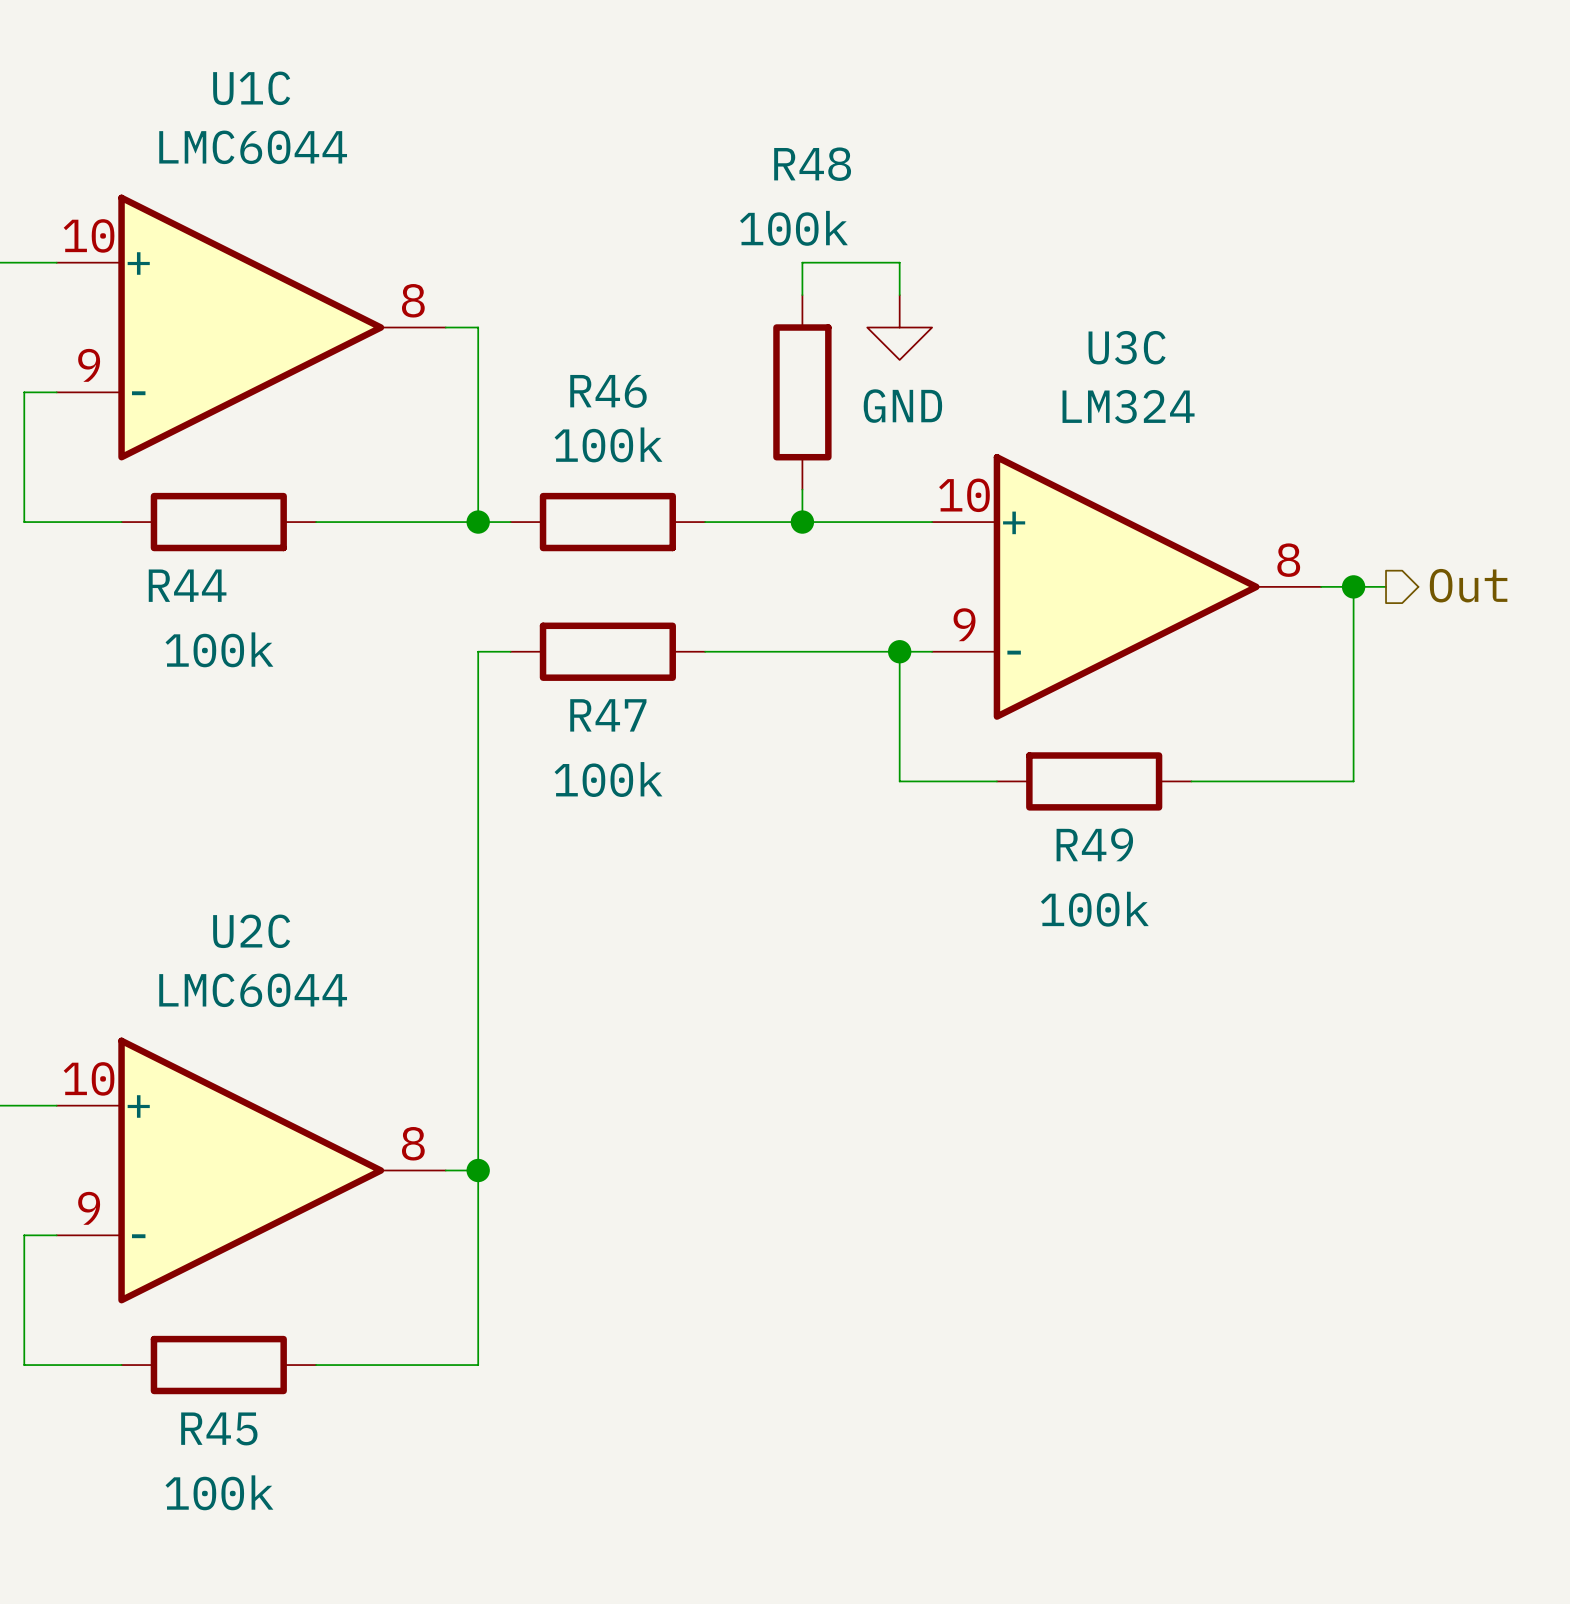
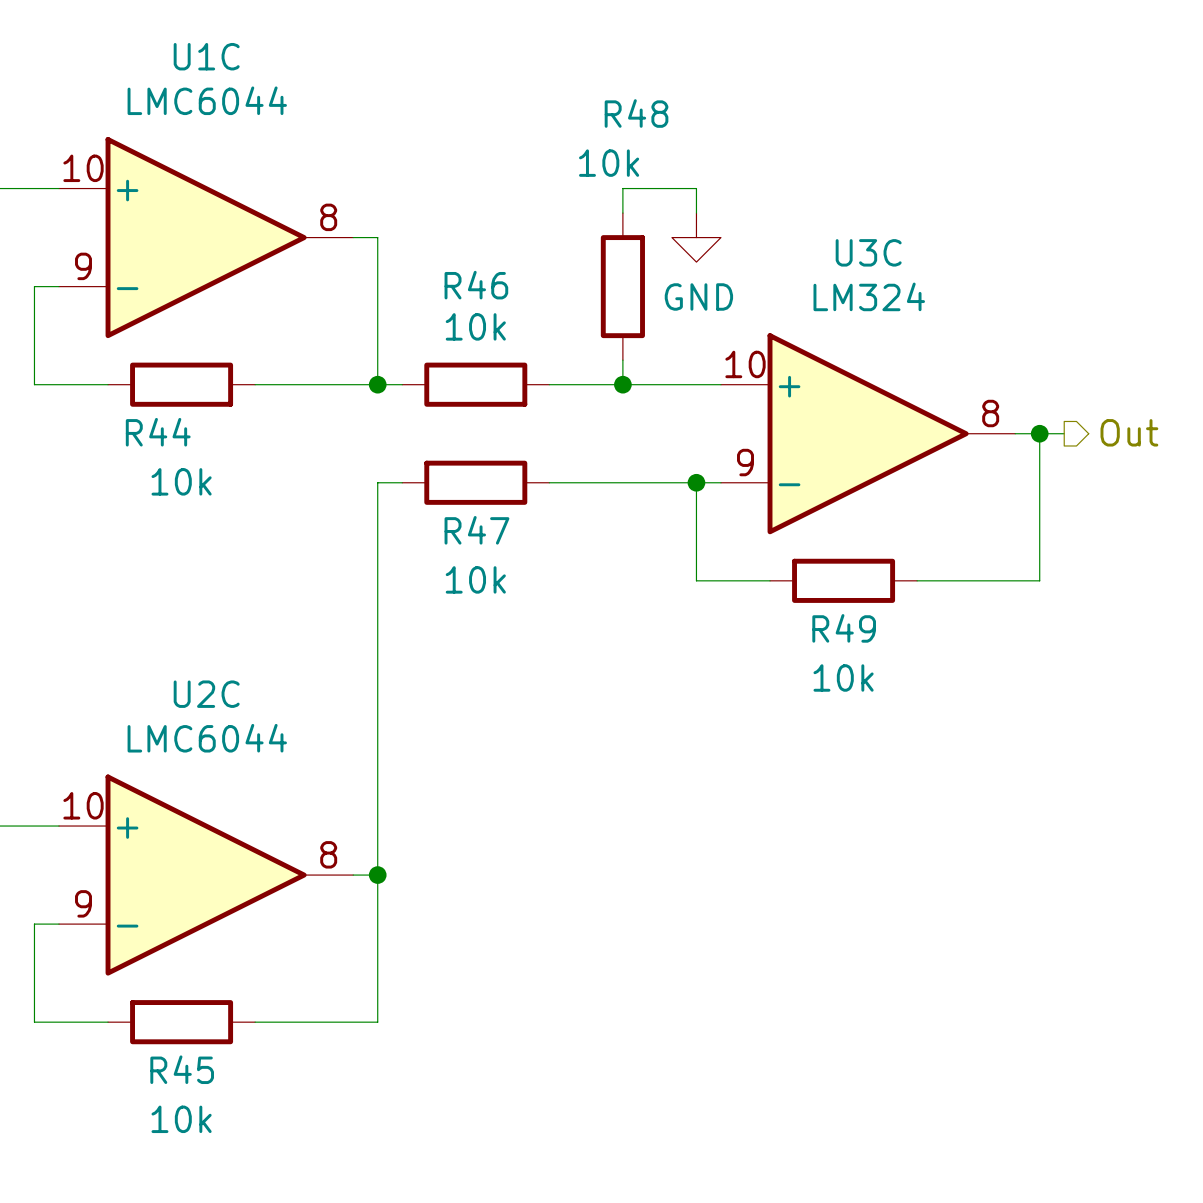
R48 value: 100k (793, 228) -> 10k (609, 163)
R46 value: 100k (608, 444) -> 10k (475, 326)
R44 value: 100k (219, 649) -> 10k (181, 481)
R47 value: 100k (608, 779) -> 10k (475, 579)
R49 value: 100k (1094, 909) -> 10k (843, 677)
R45 value: 100k (219, 1492) -> 10k (181, 1119)

